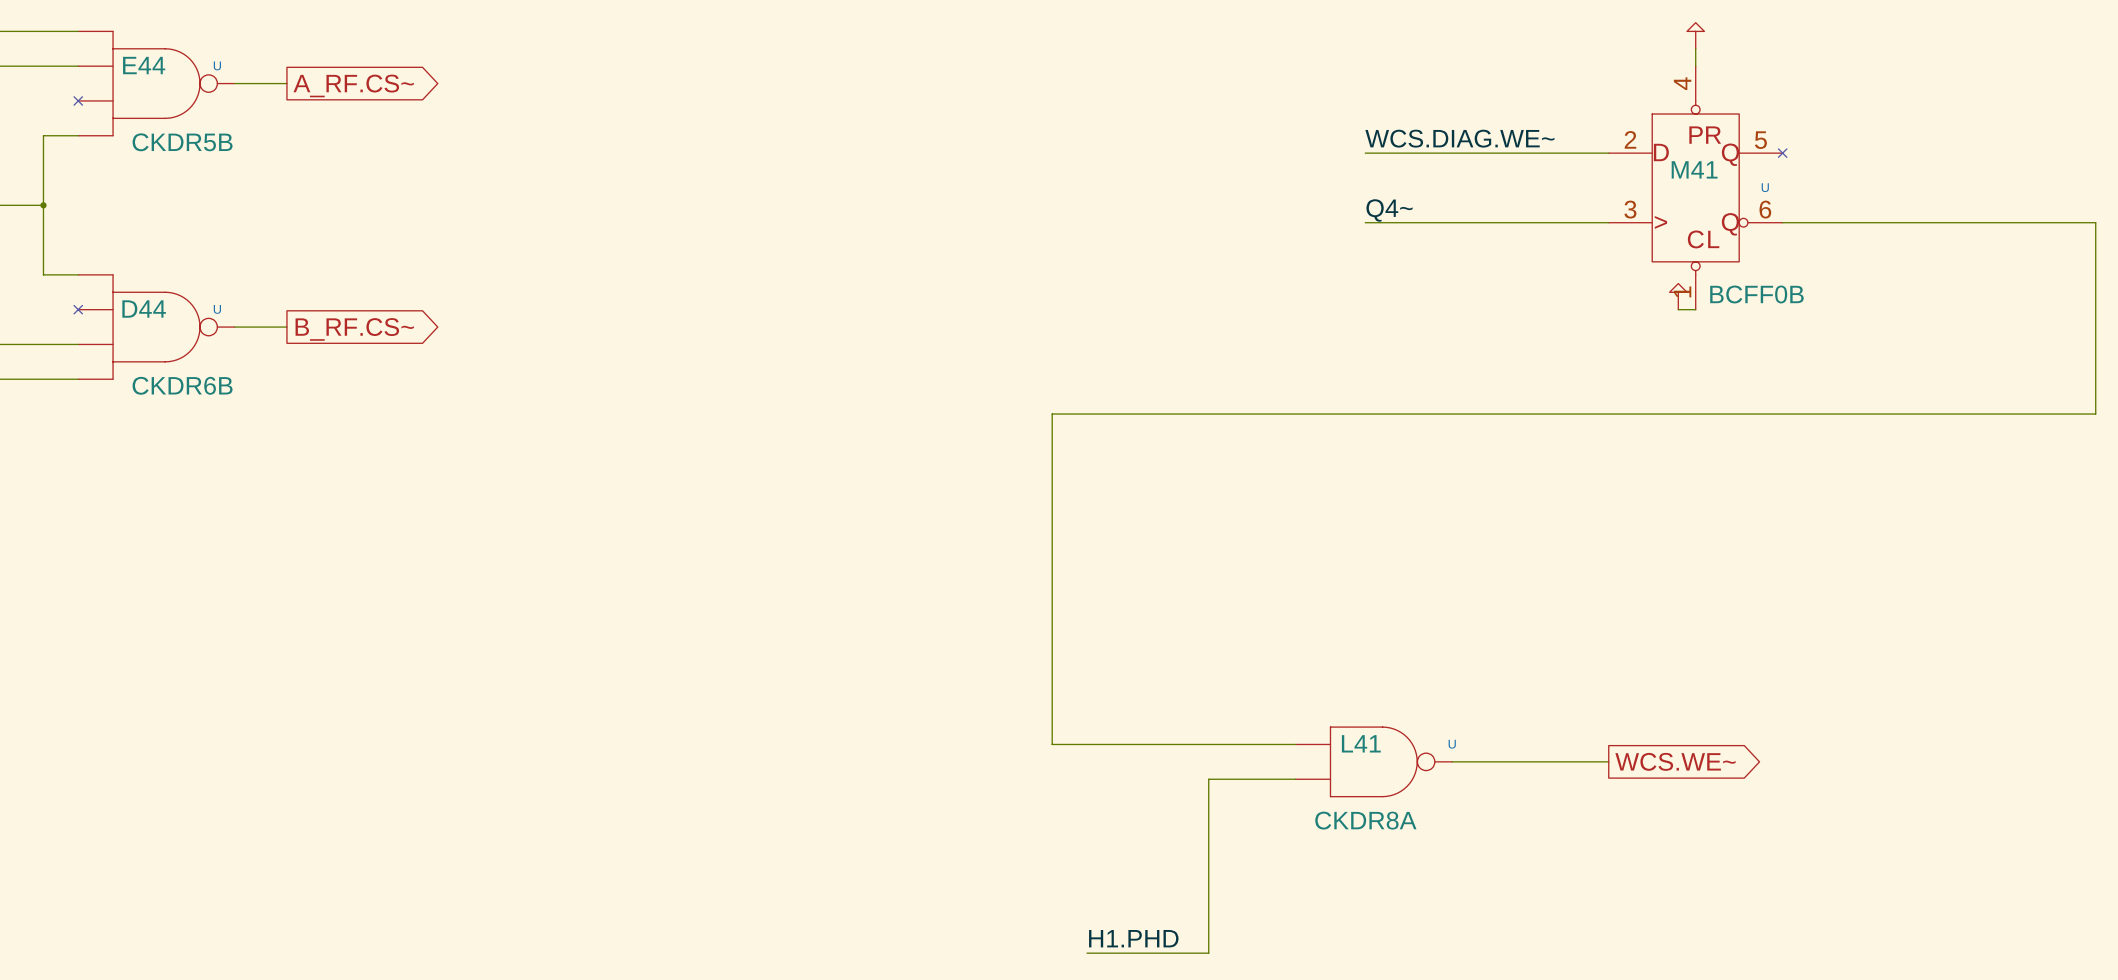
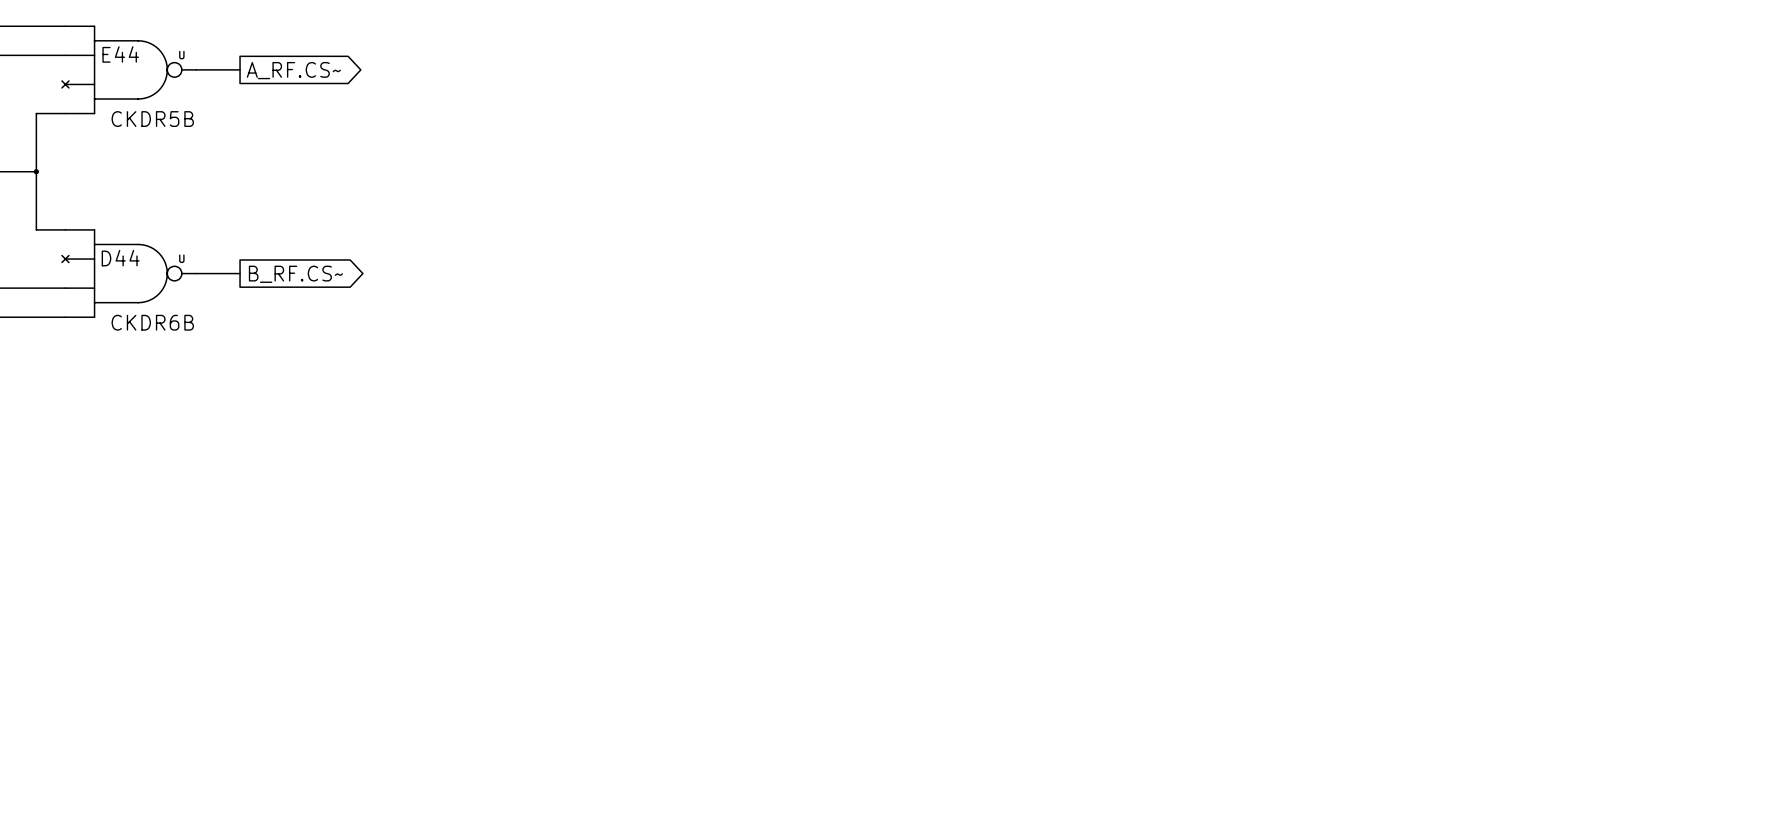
power symbol: (1695, 35) -> none
wire: (1695, 48) (1695, 66) -> none
label: WCS.DIAG.WE~ (1459, 138) -> none
wire: (1365, 153) (1608, 153) -> none
no-connect mark: (1782, 153) -> none
U: (1695, 187) -> none
label: Q4~ (1389, 210) -> none
wire: (1365, 222) (1608, 222) -> none
wire: (1782, 222) (2095, 222) (2095, 414) (1052, 414) (1052, 744) (1295, 744) -> none
power symbol: (1678, 296) -> none
wire: (1678, 309) (1695, 309) -> none
U: (1373, 761) -> none
wire: (1452, 761) (1608, 761) -> none
global label: WCS.WE~ (1675, 761) -> none
wire: (1295, 779) (1208, 779) (1208, 953) (1086, 953) -> none
label: H1.PHD (1133, 938) -> none

